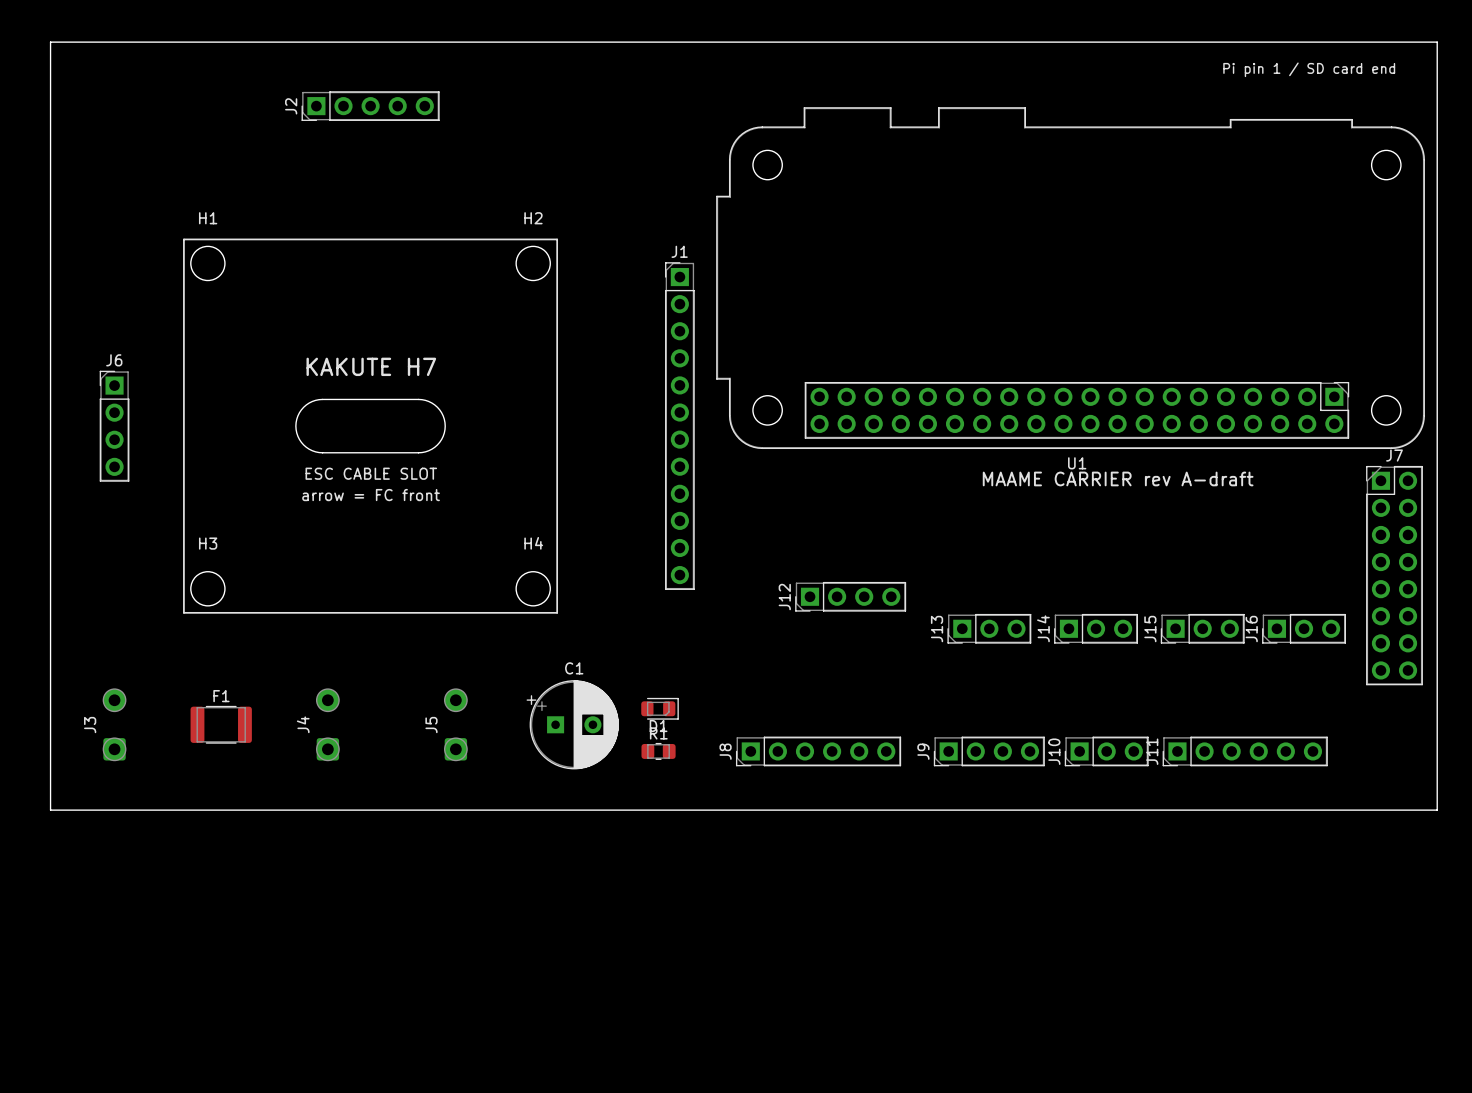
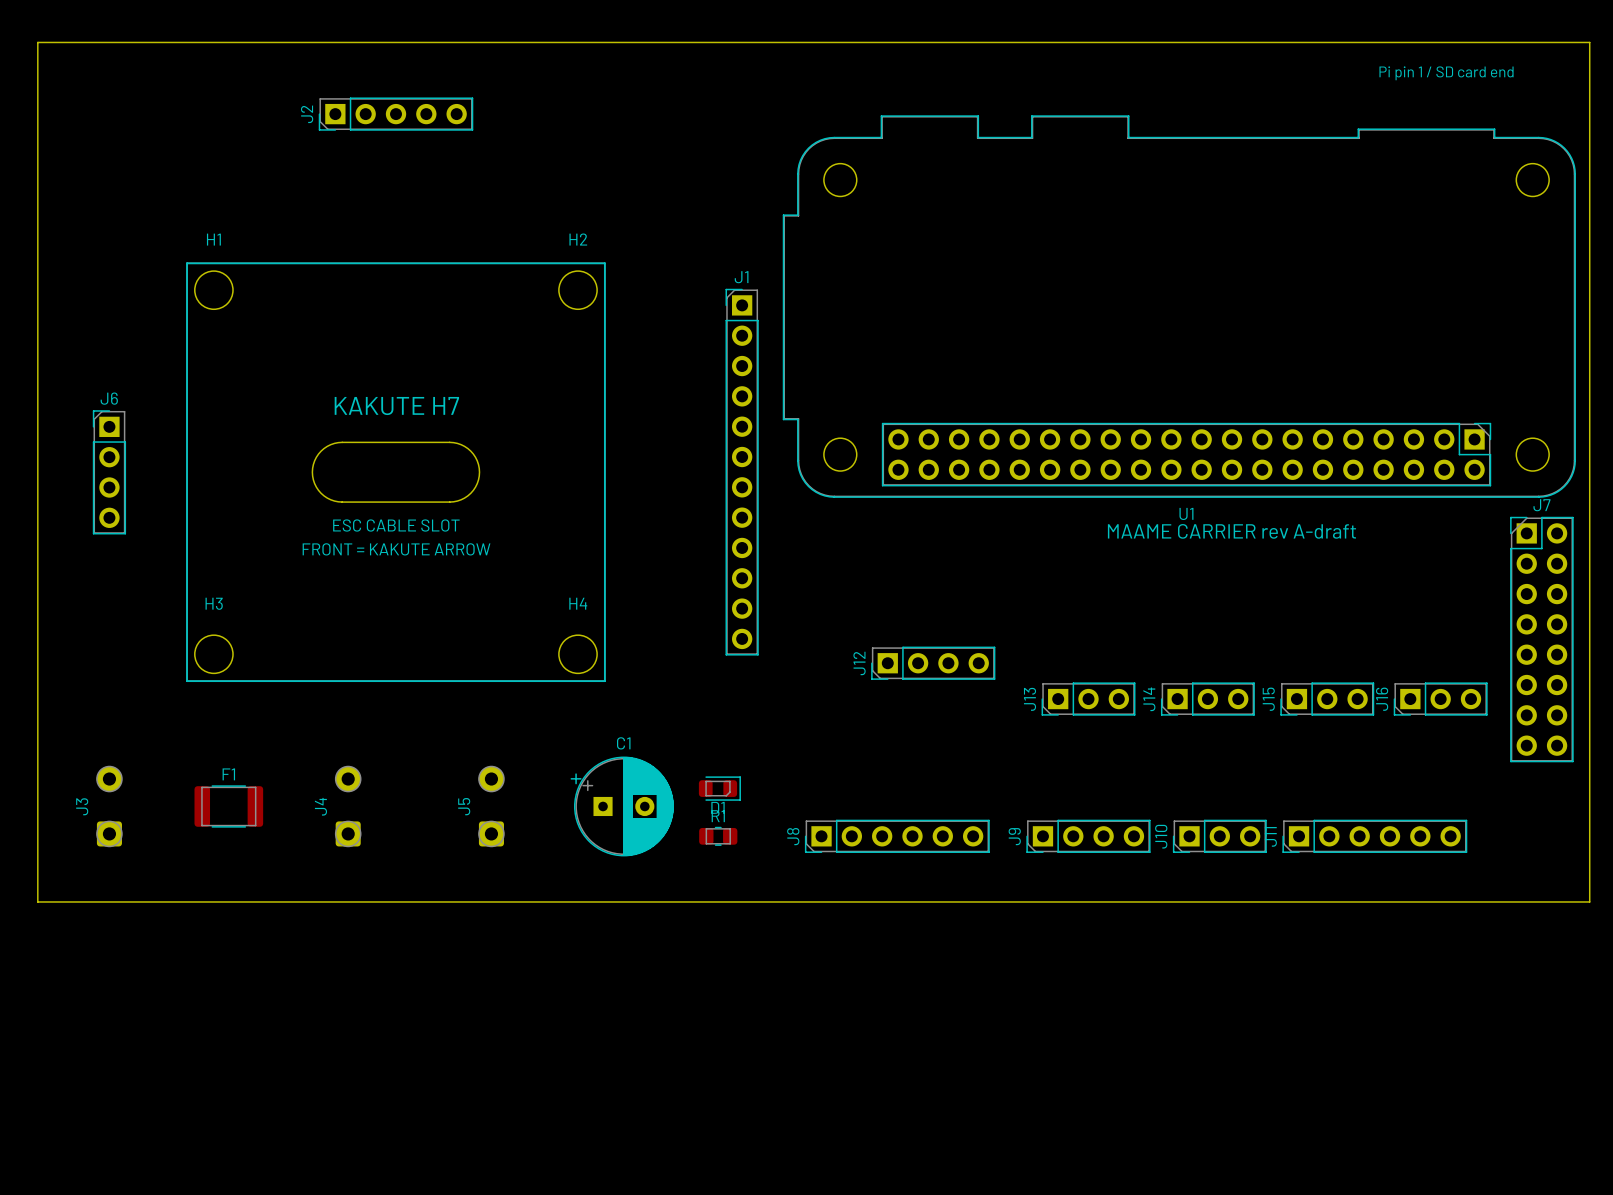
text: arrow = FC front (371, 495) -> FRONT = KAKUTE ARROW (396, 549)

